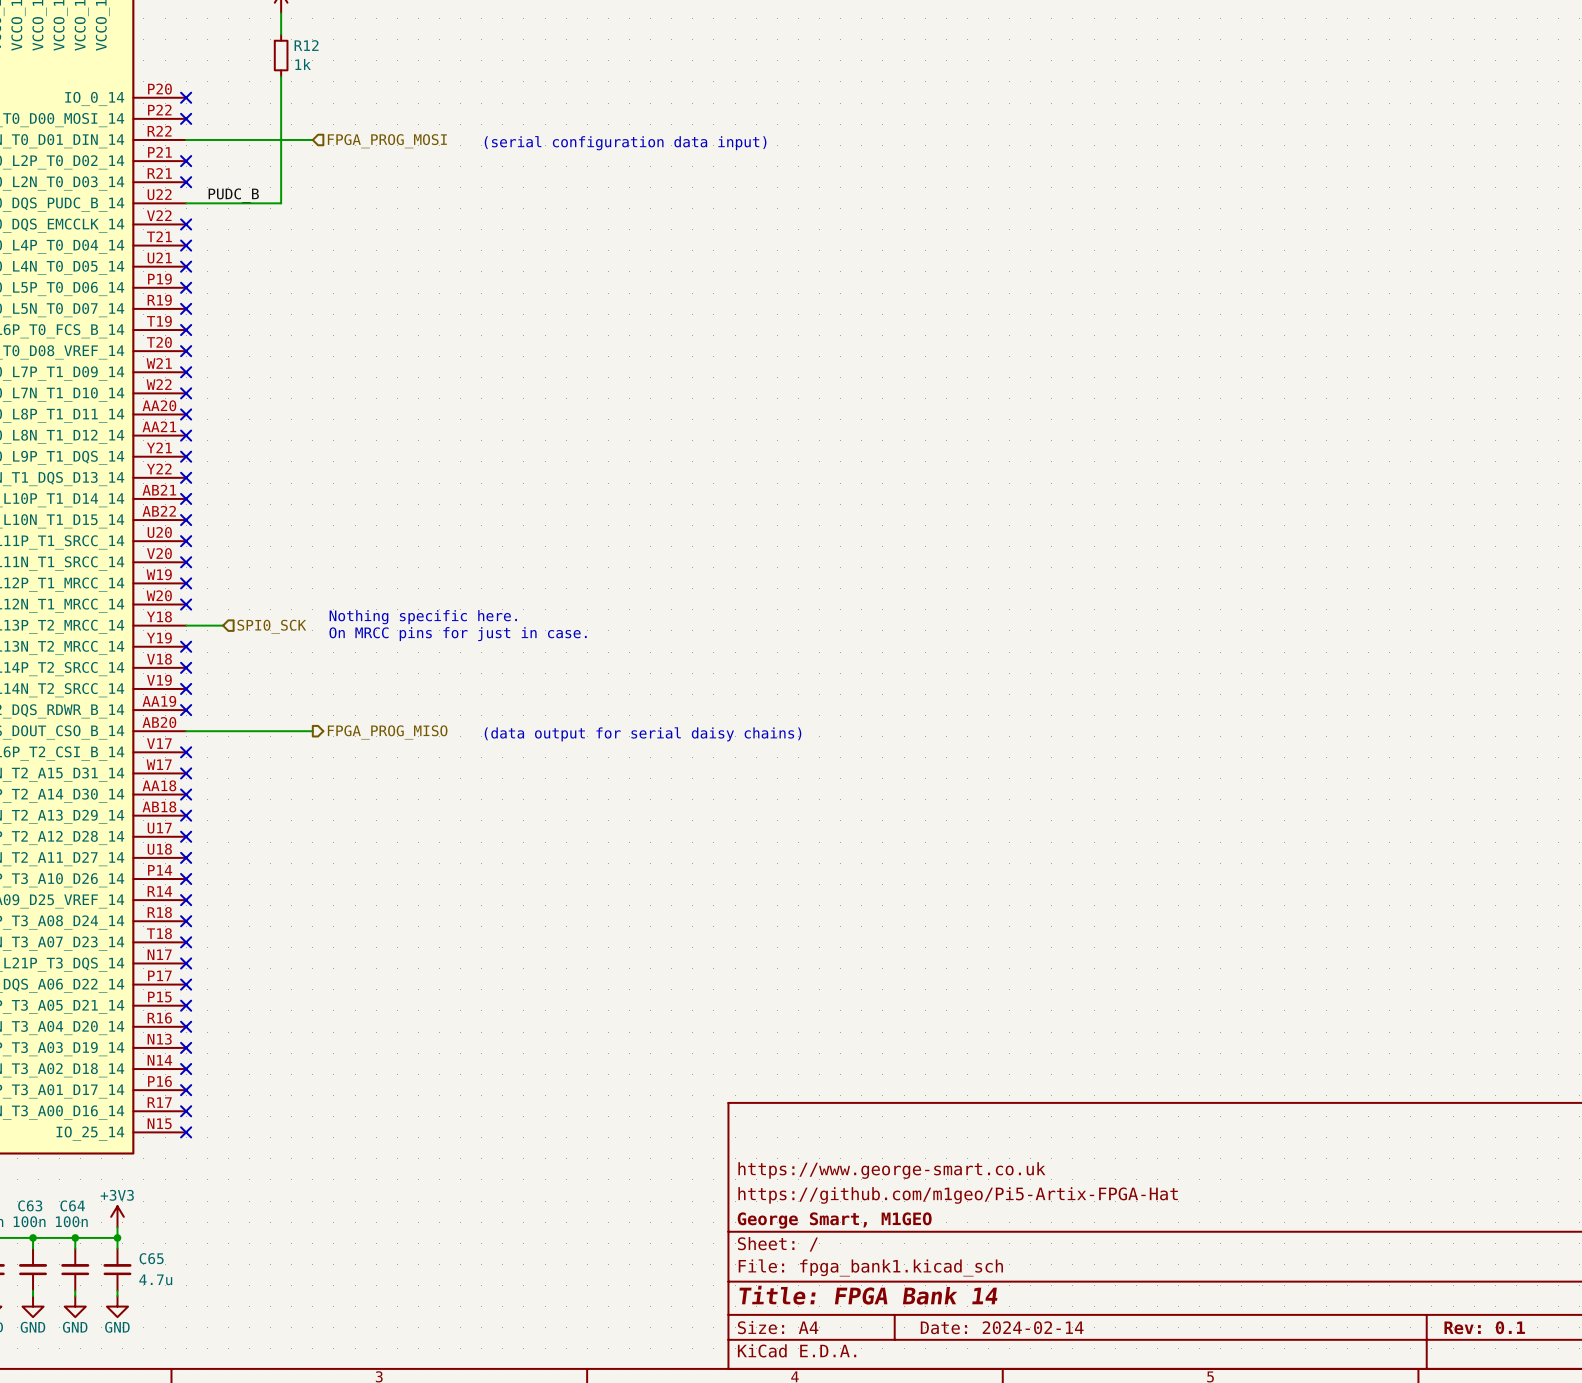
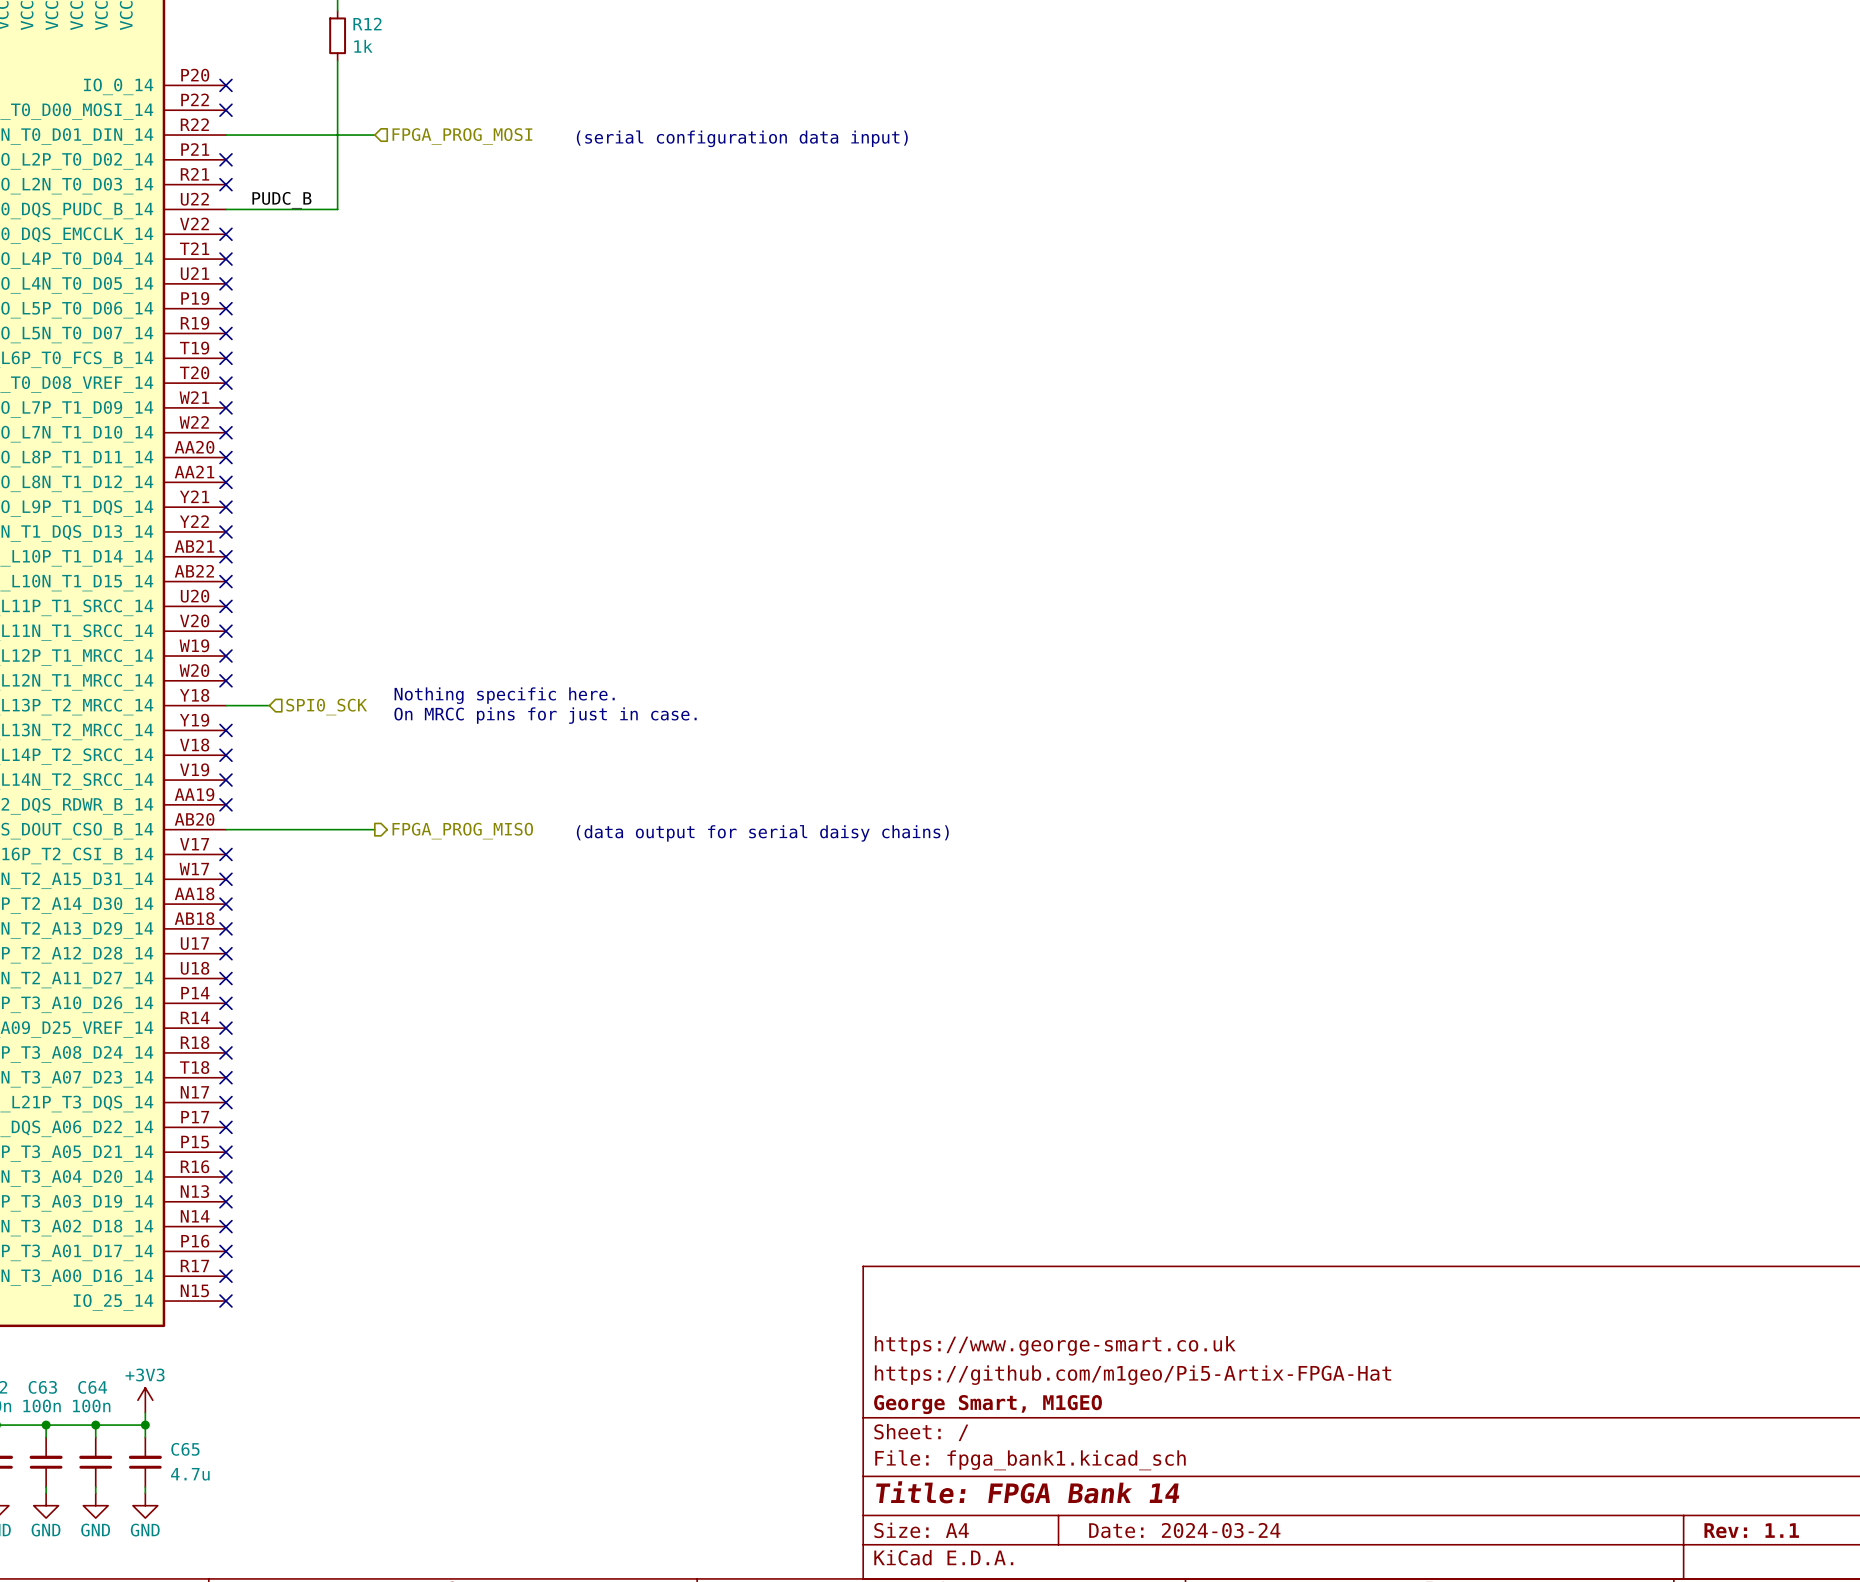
title block: Date: 2024-02-14 (1002, 1327) -> Date: 2024-03-24 (1184, 1530)
title block: Rev: 0.1 (1484, 1327) -> Rev: 1.1 (1751, 1530)

